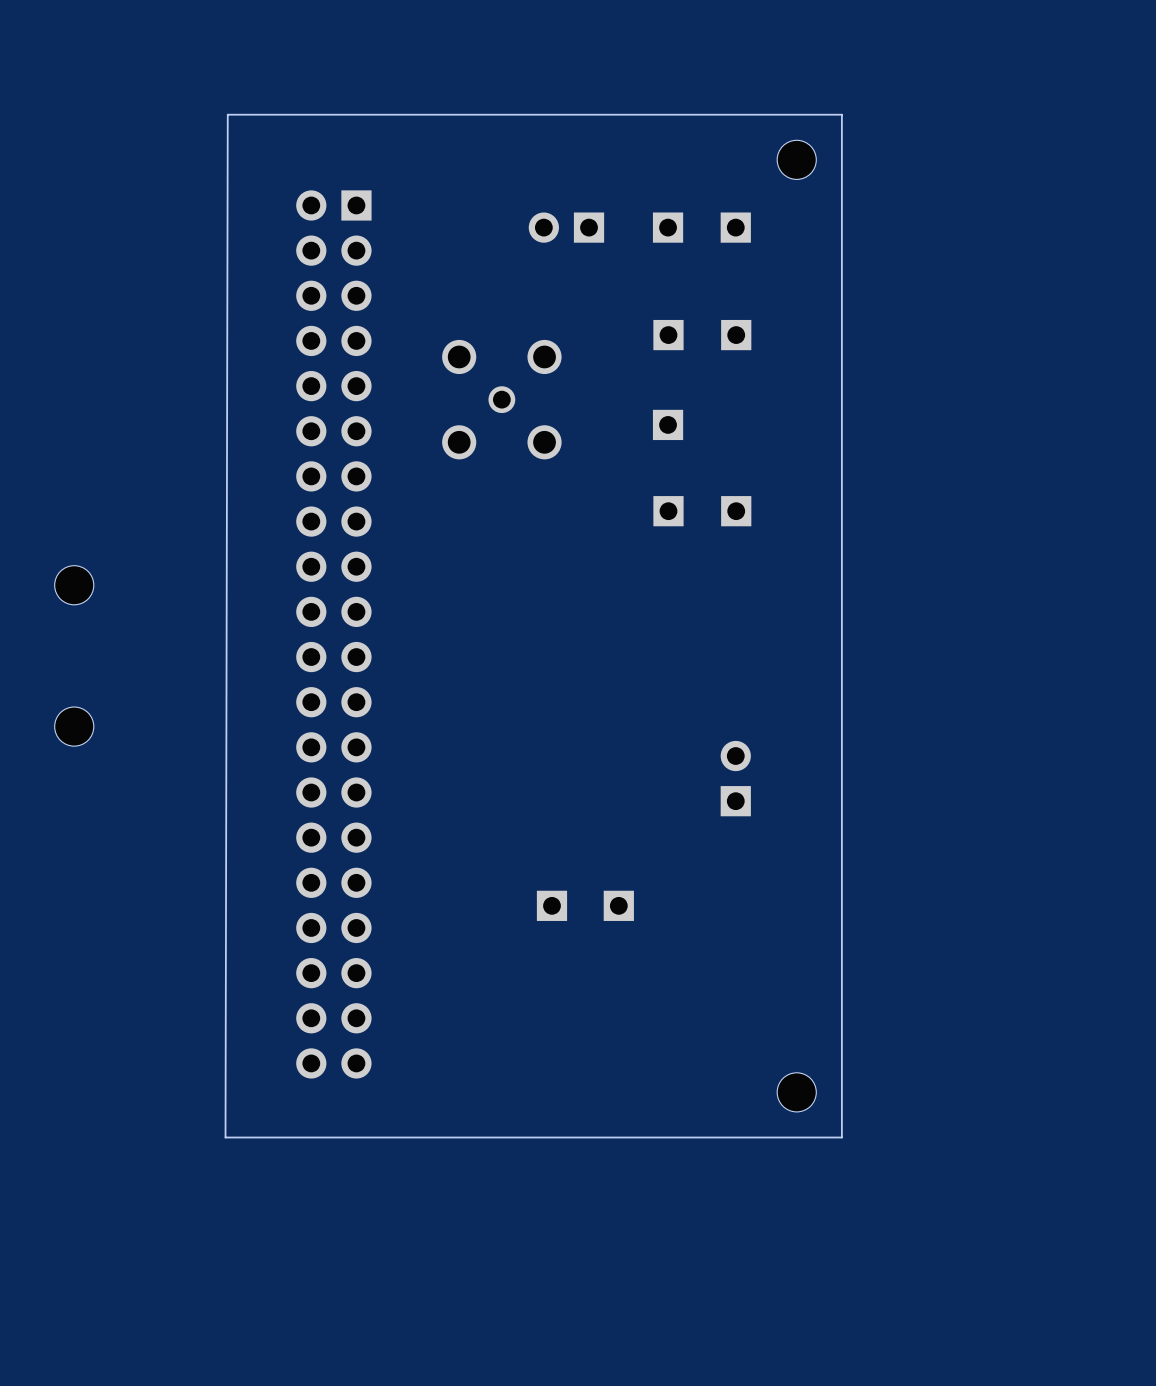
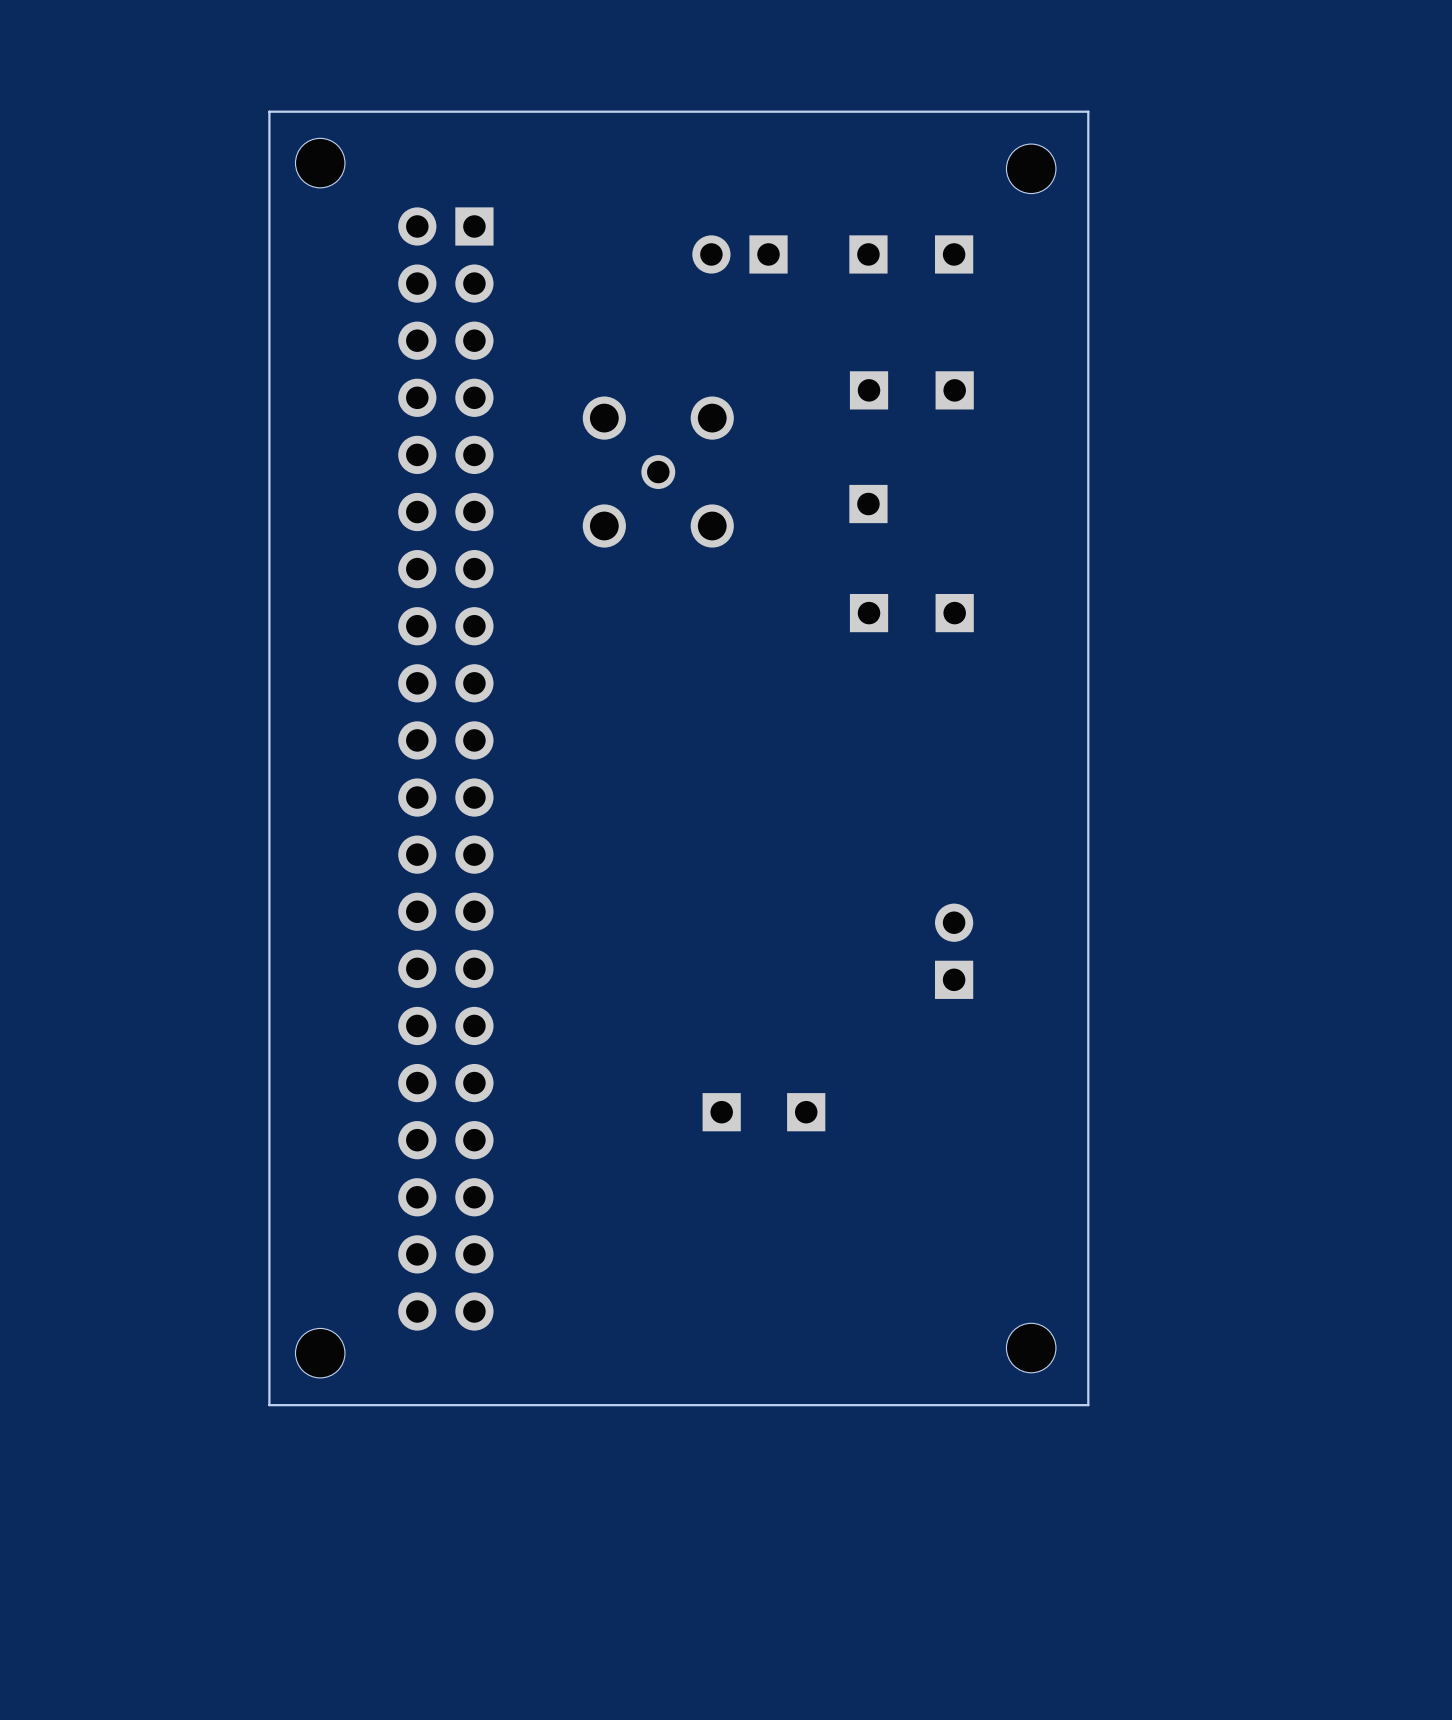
board edge: (227, 114) (225, 1137) -> (311, 111) (269, 111) (269, 1405) (308, 1405)
part: none -> (320, 163)
part: (74, 585) -> none
part: (74, 726) -> none
part: none -> (320, 1353)

